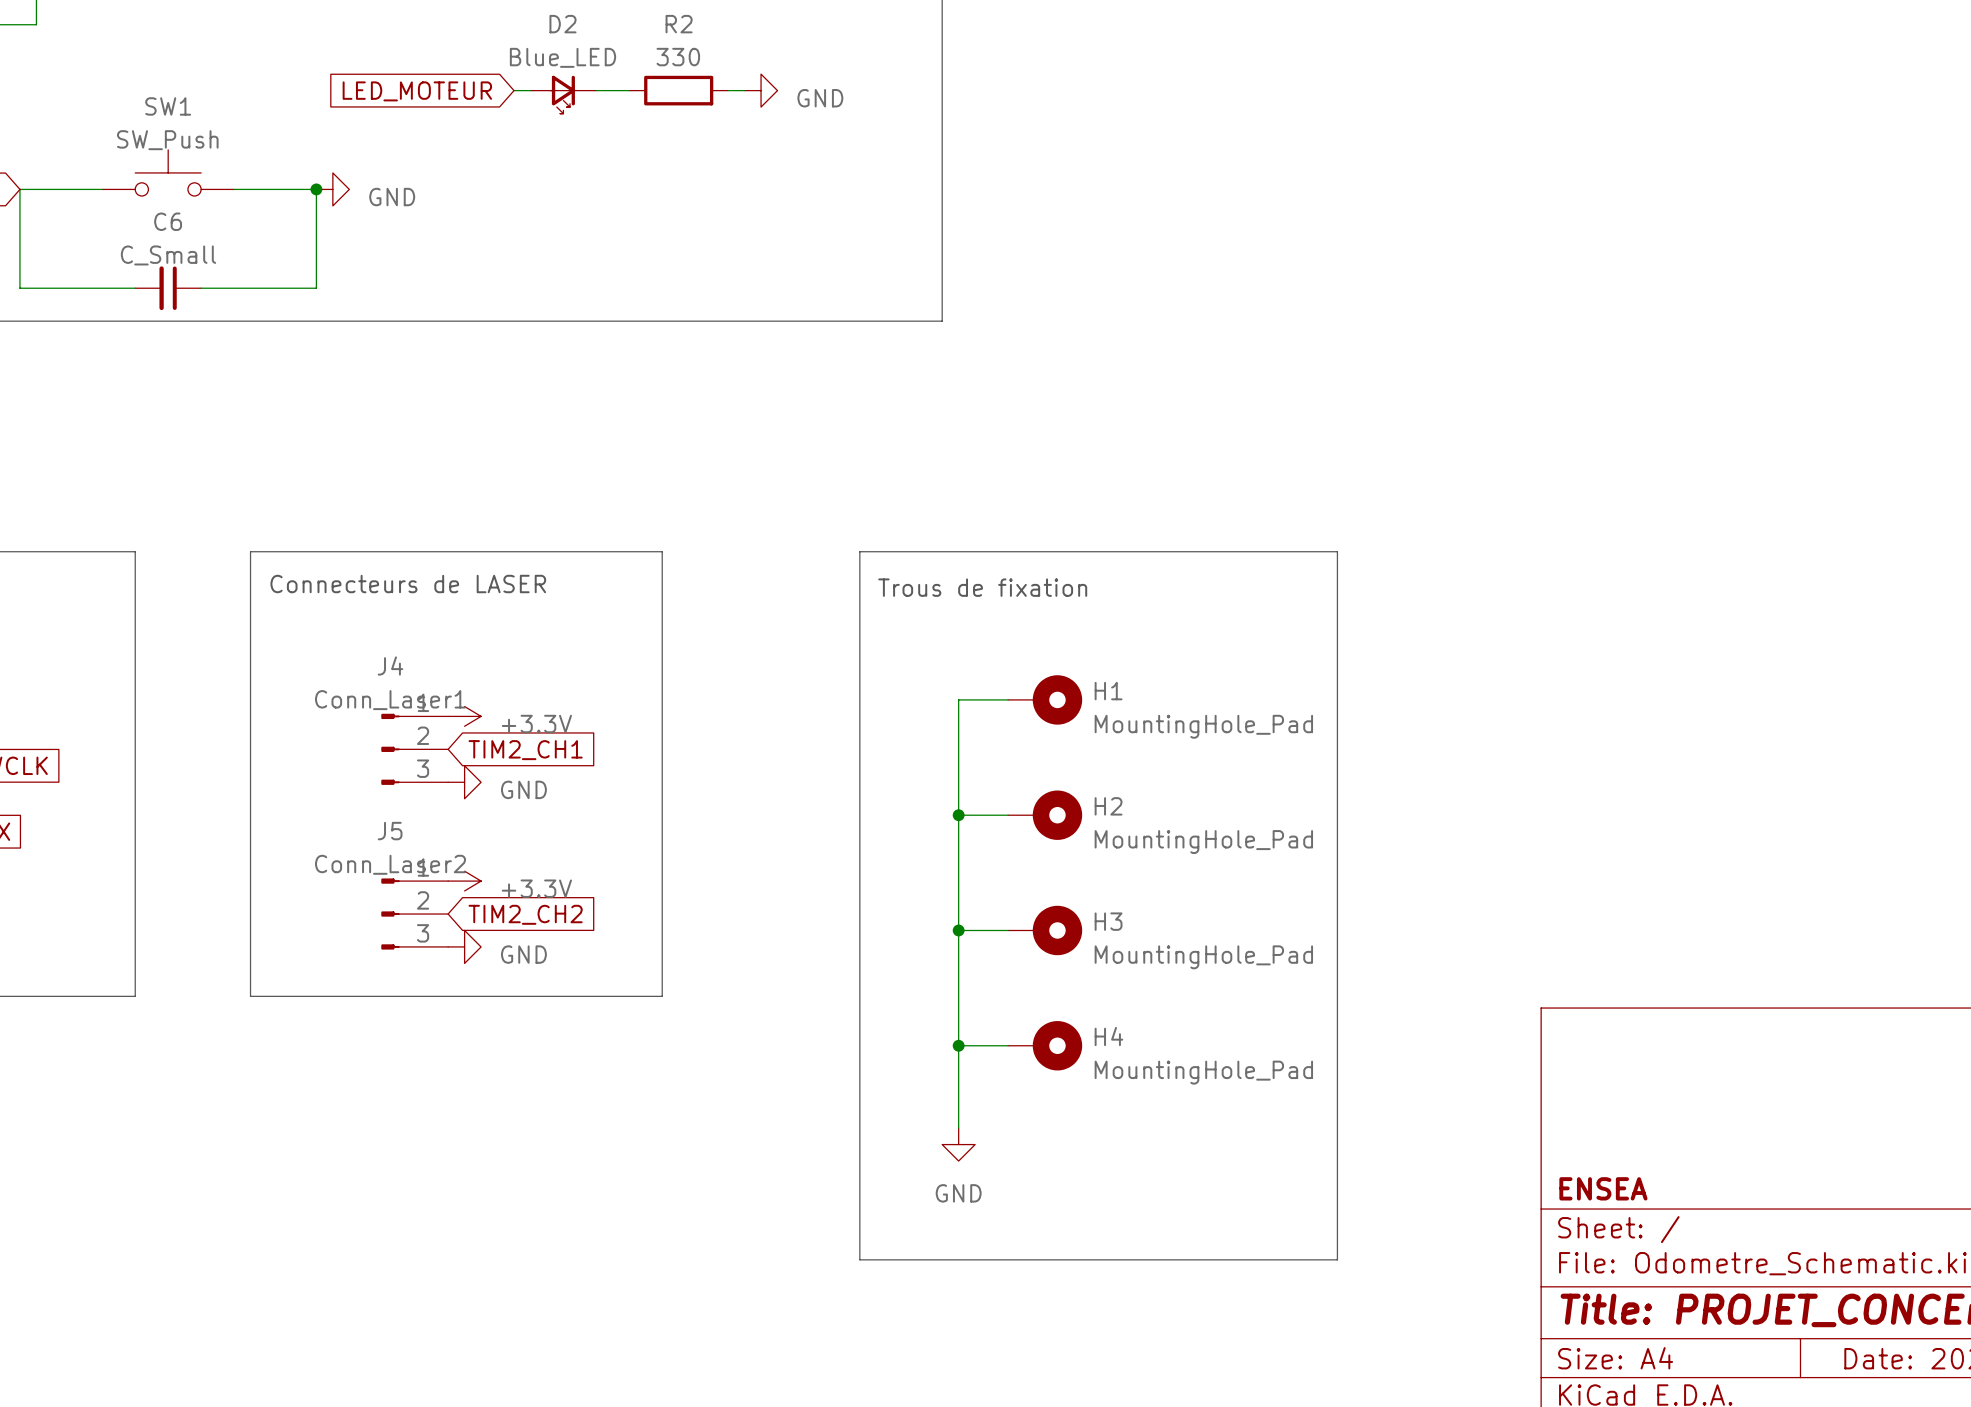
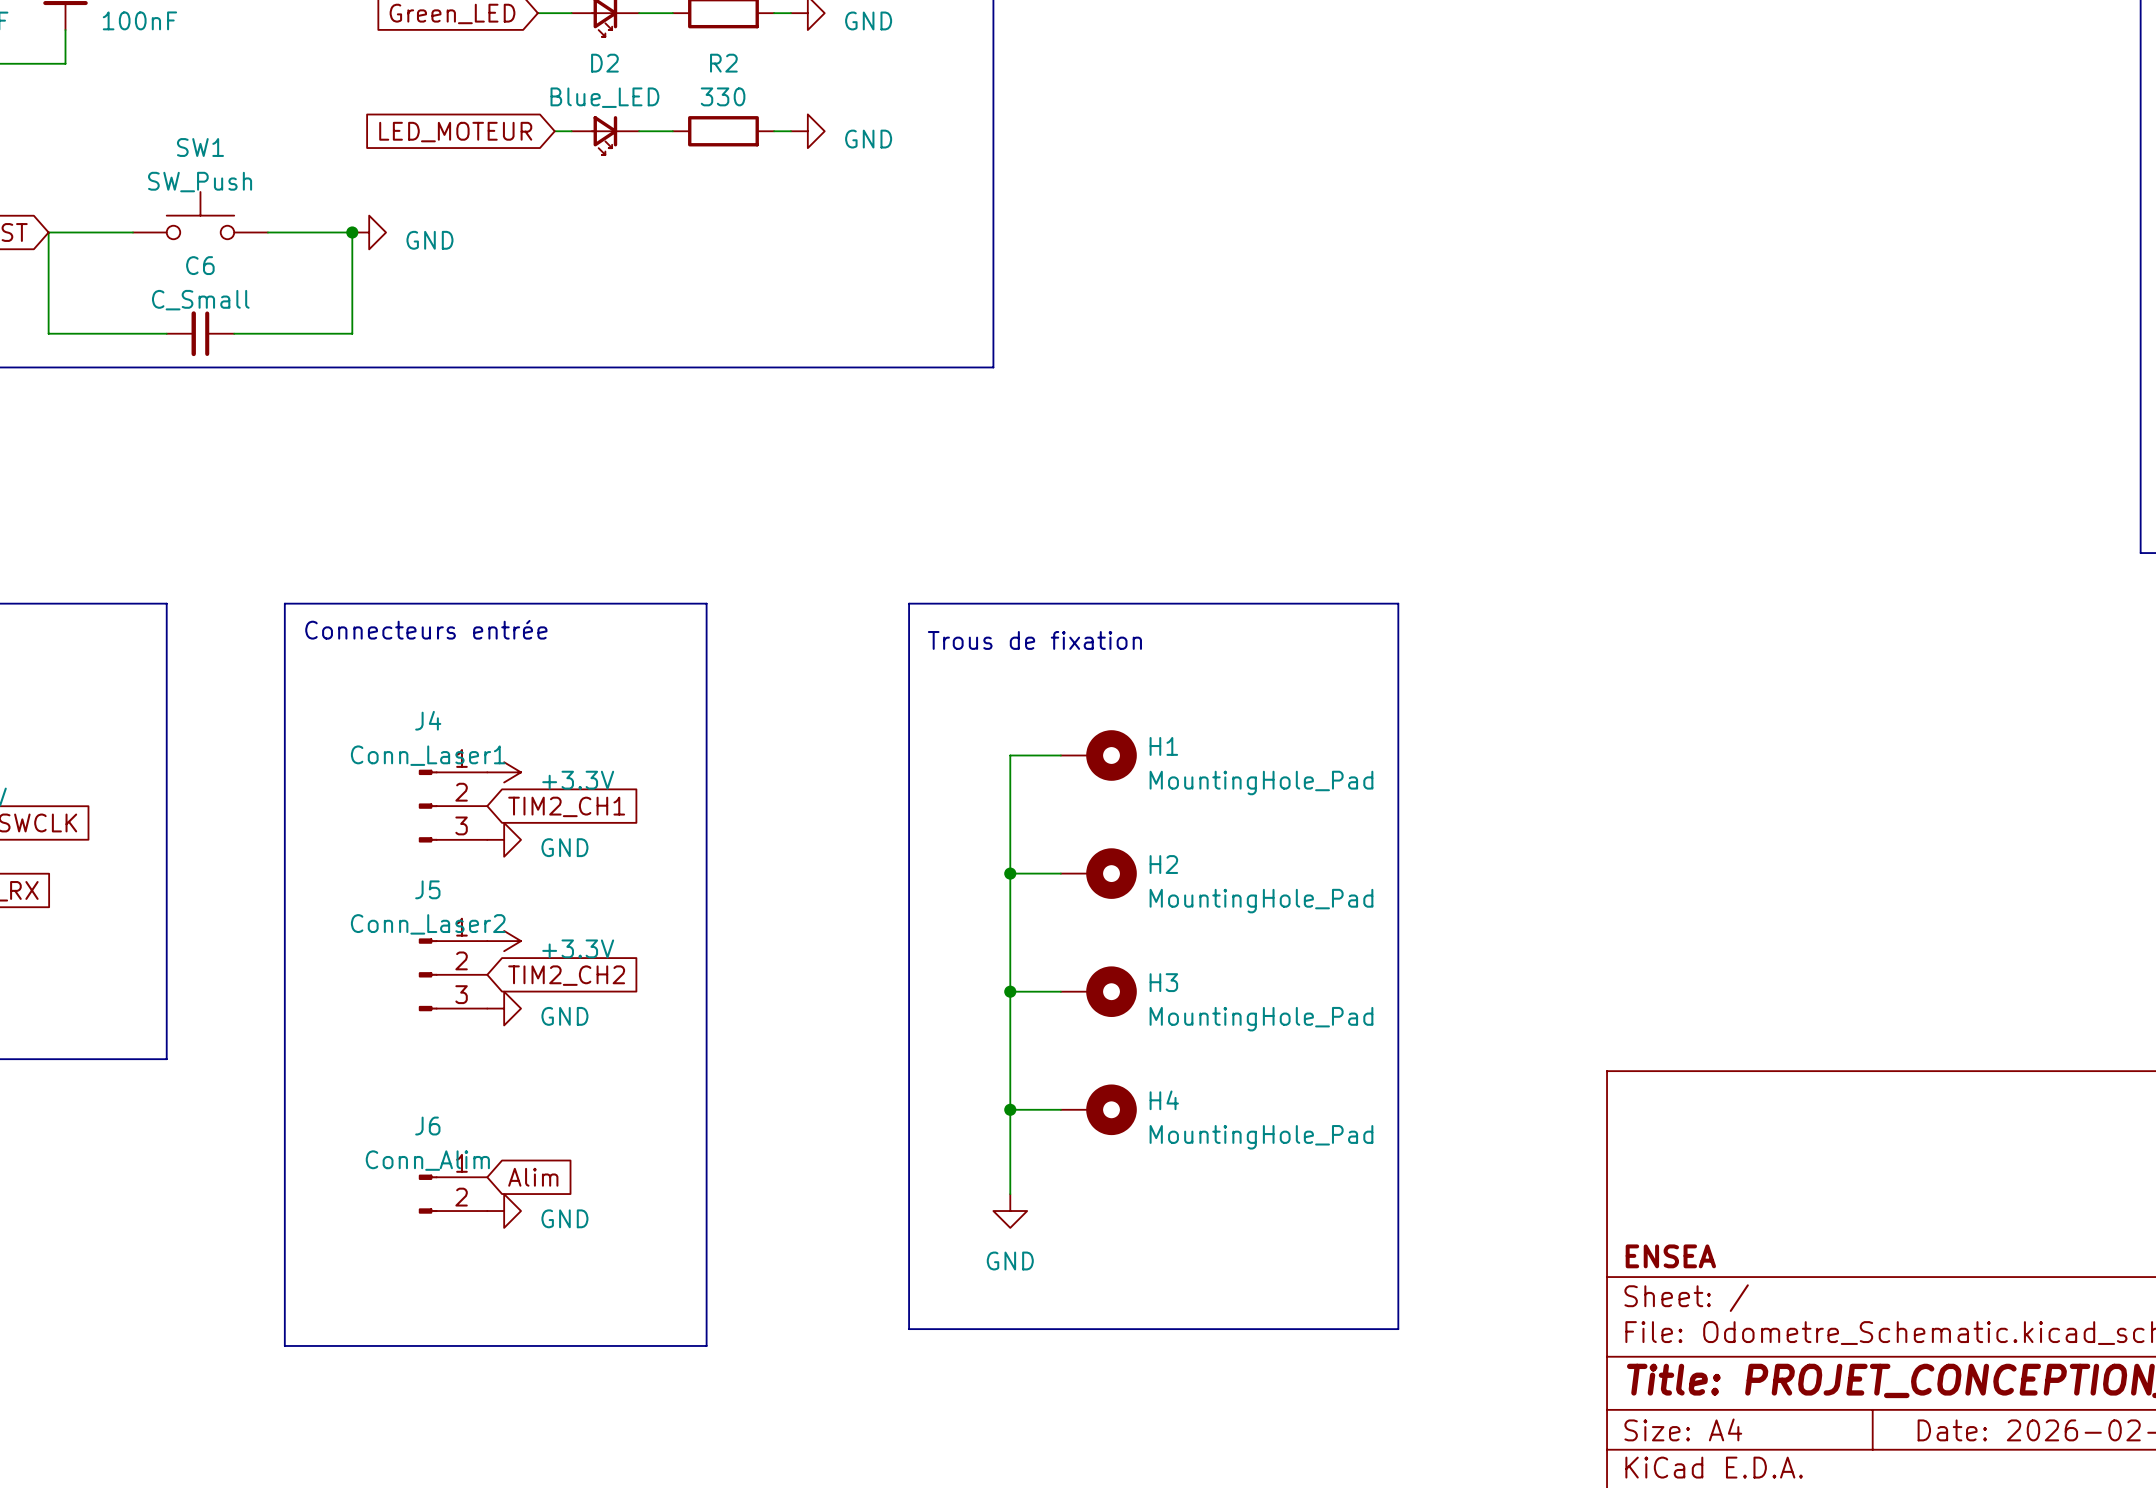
text: Connecteurs de LASER (408, 584) -> Connecteurs entrée (426, 629)
line: (250, 996) (662, 996) -> (284, 1059) (284, 1345) (706, 1345) (706, 1059)
global label: none -> Alim (533, 1177)
J6: none -> Conn_Alim (453, 1194)
power symbol: none -> GND (504, 1211)

